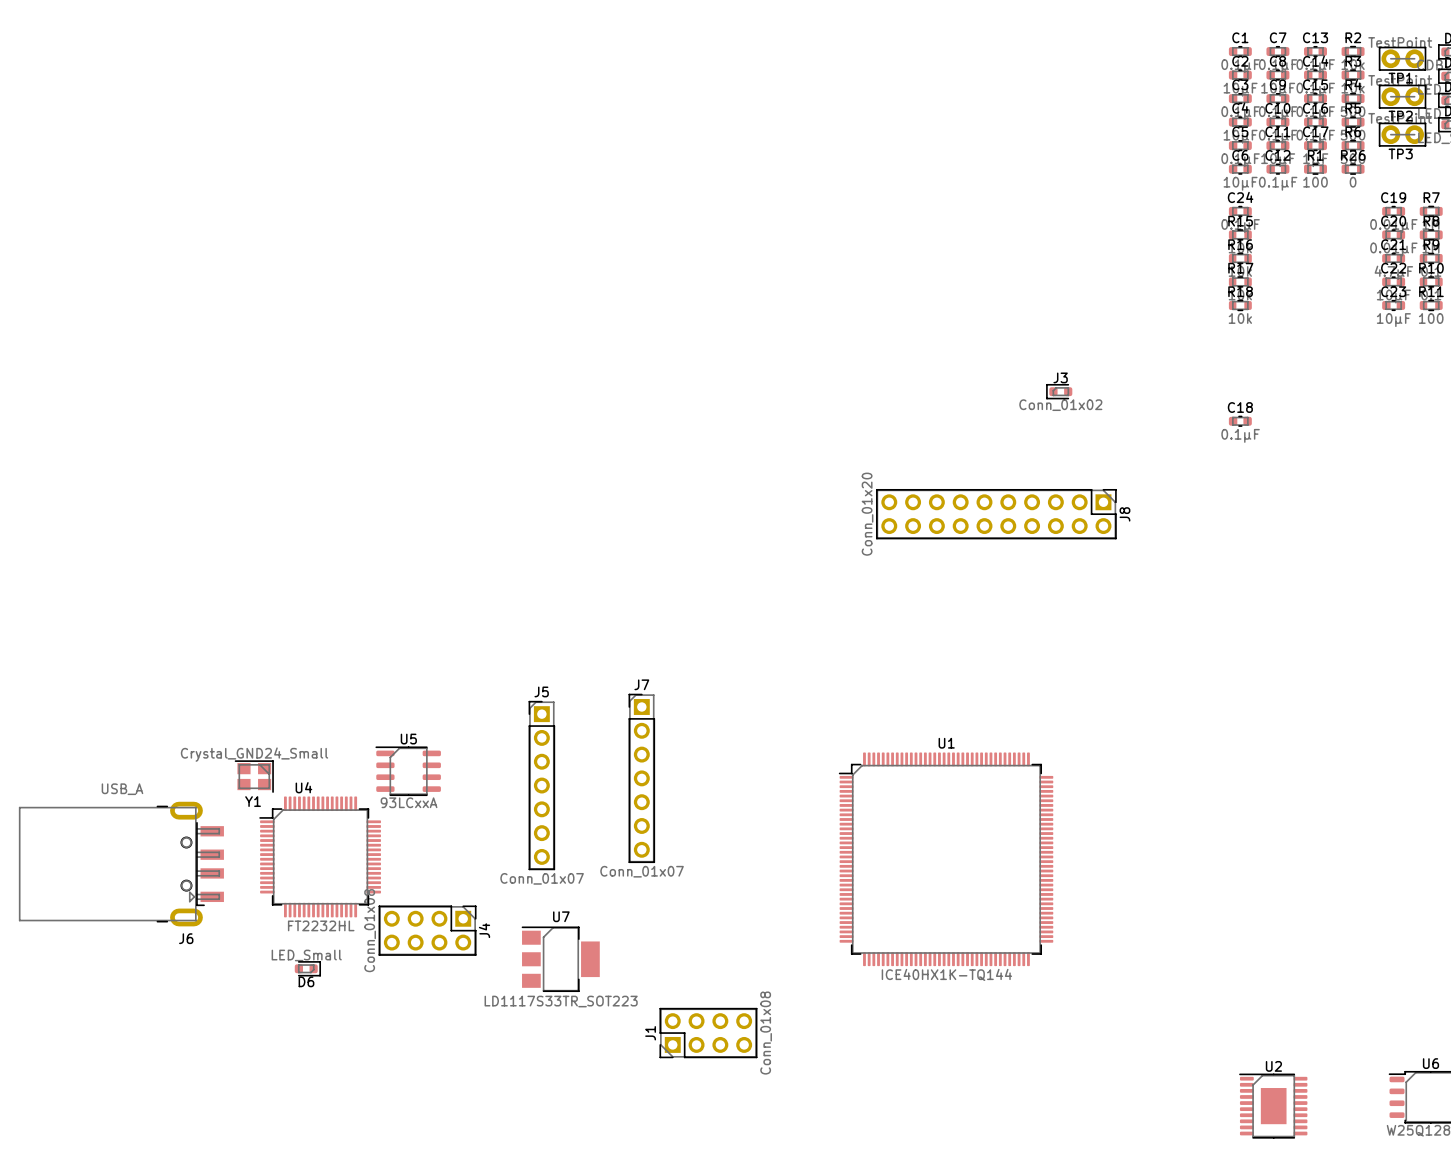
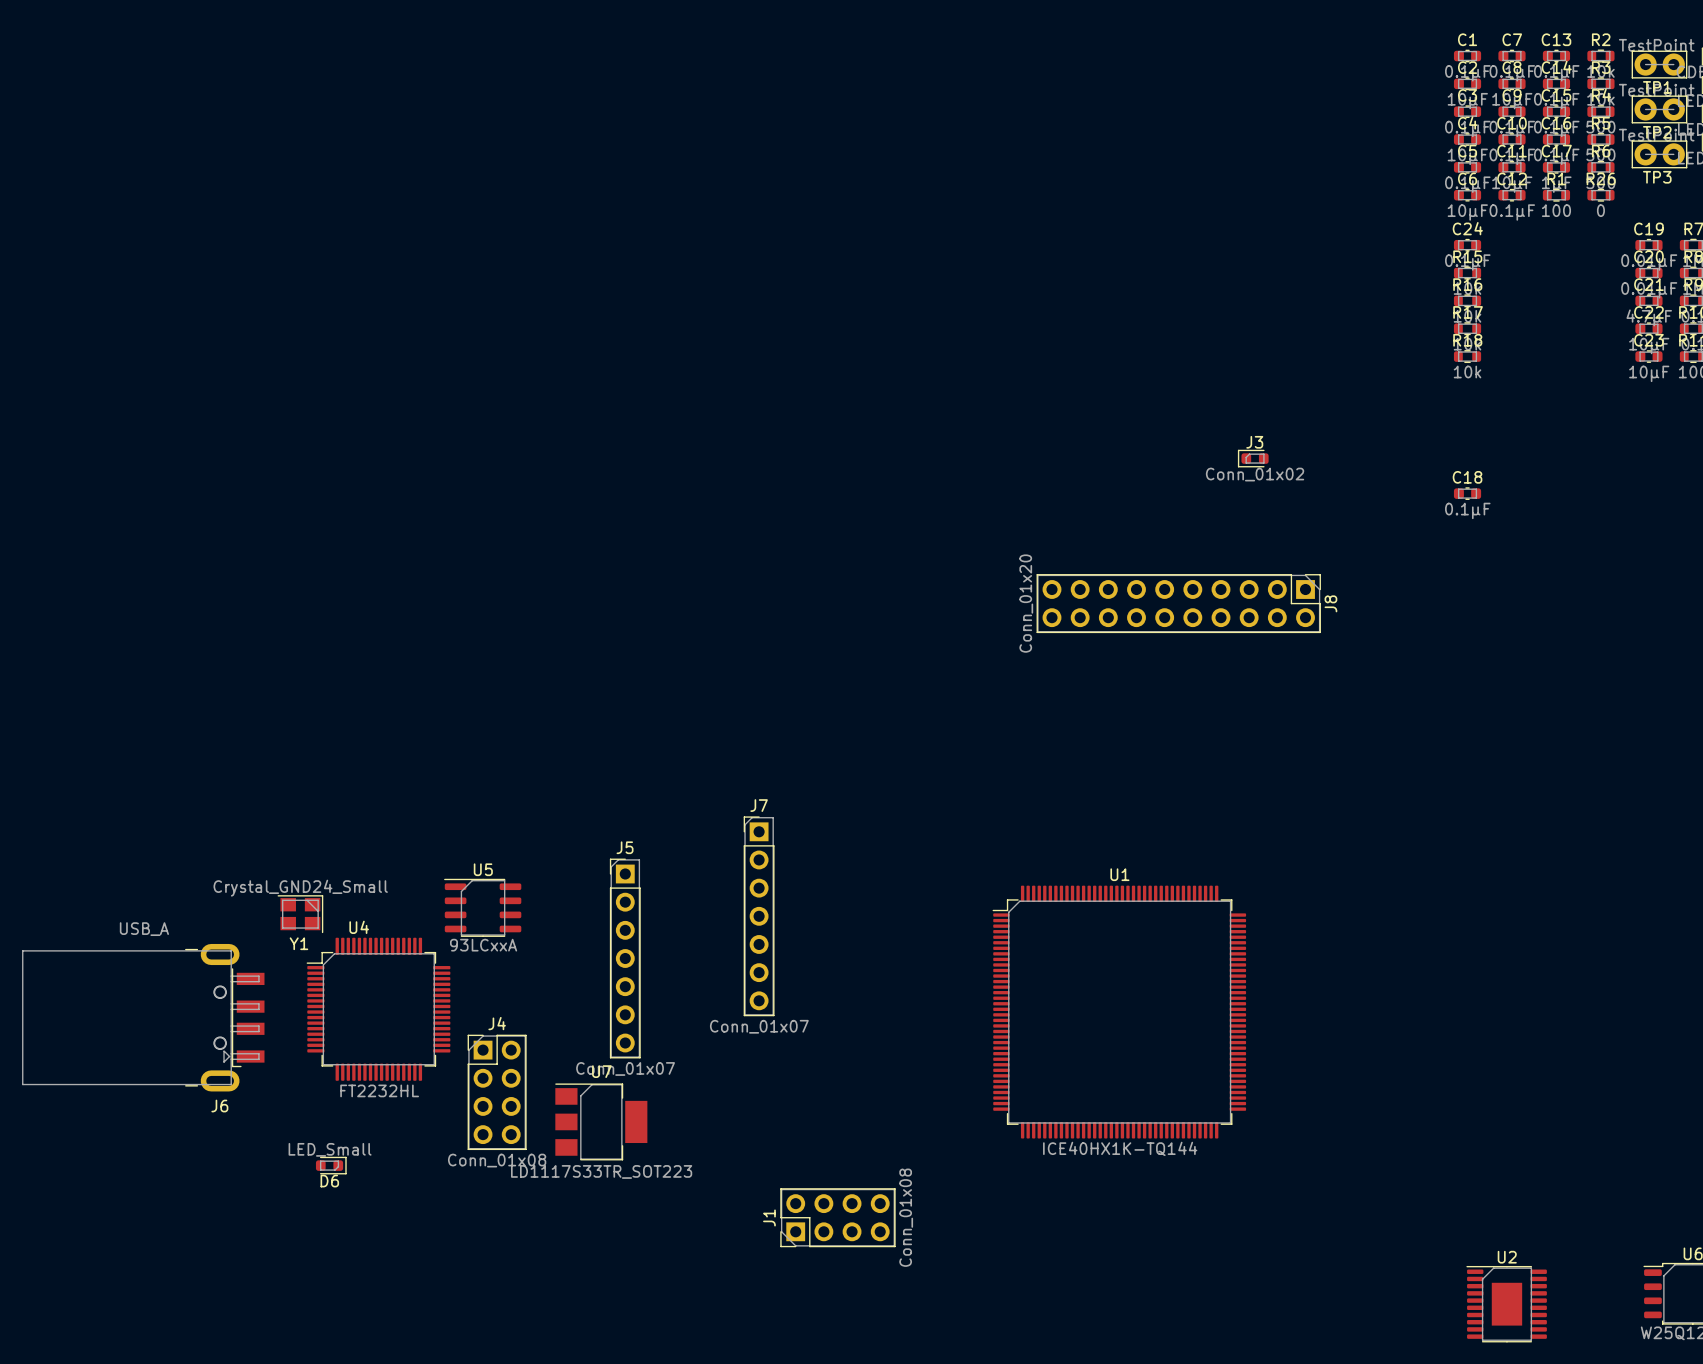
J5 position: (541, 785) -> (625, 958)
J4 rotation: 0° (427, 930) -> 90° counterclockwise (497, 1092)
U7 position: (560, 959) -> (601, 1121)
D6 position: (307, 968) -> (331, 1165)

